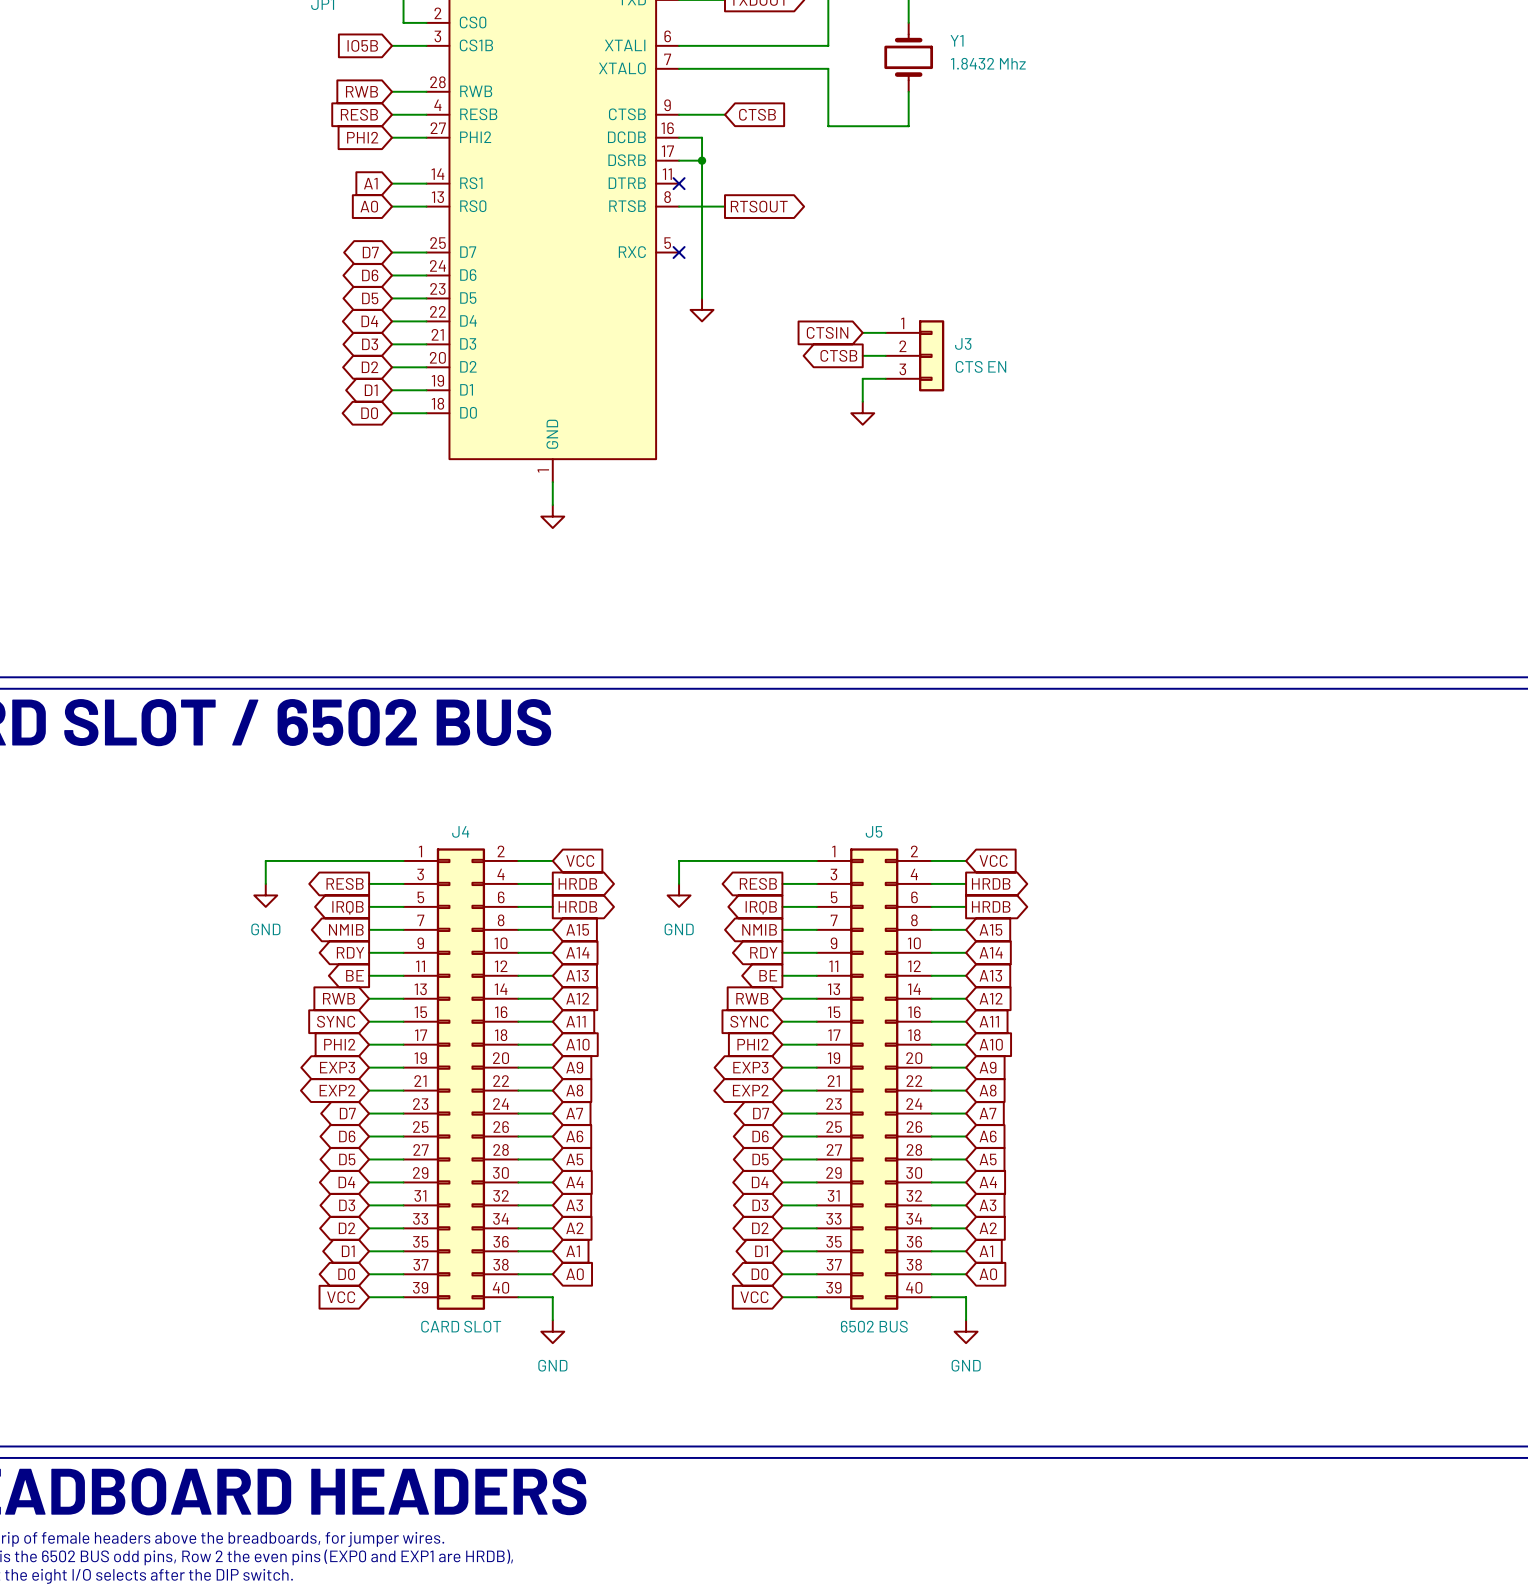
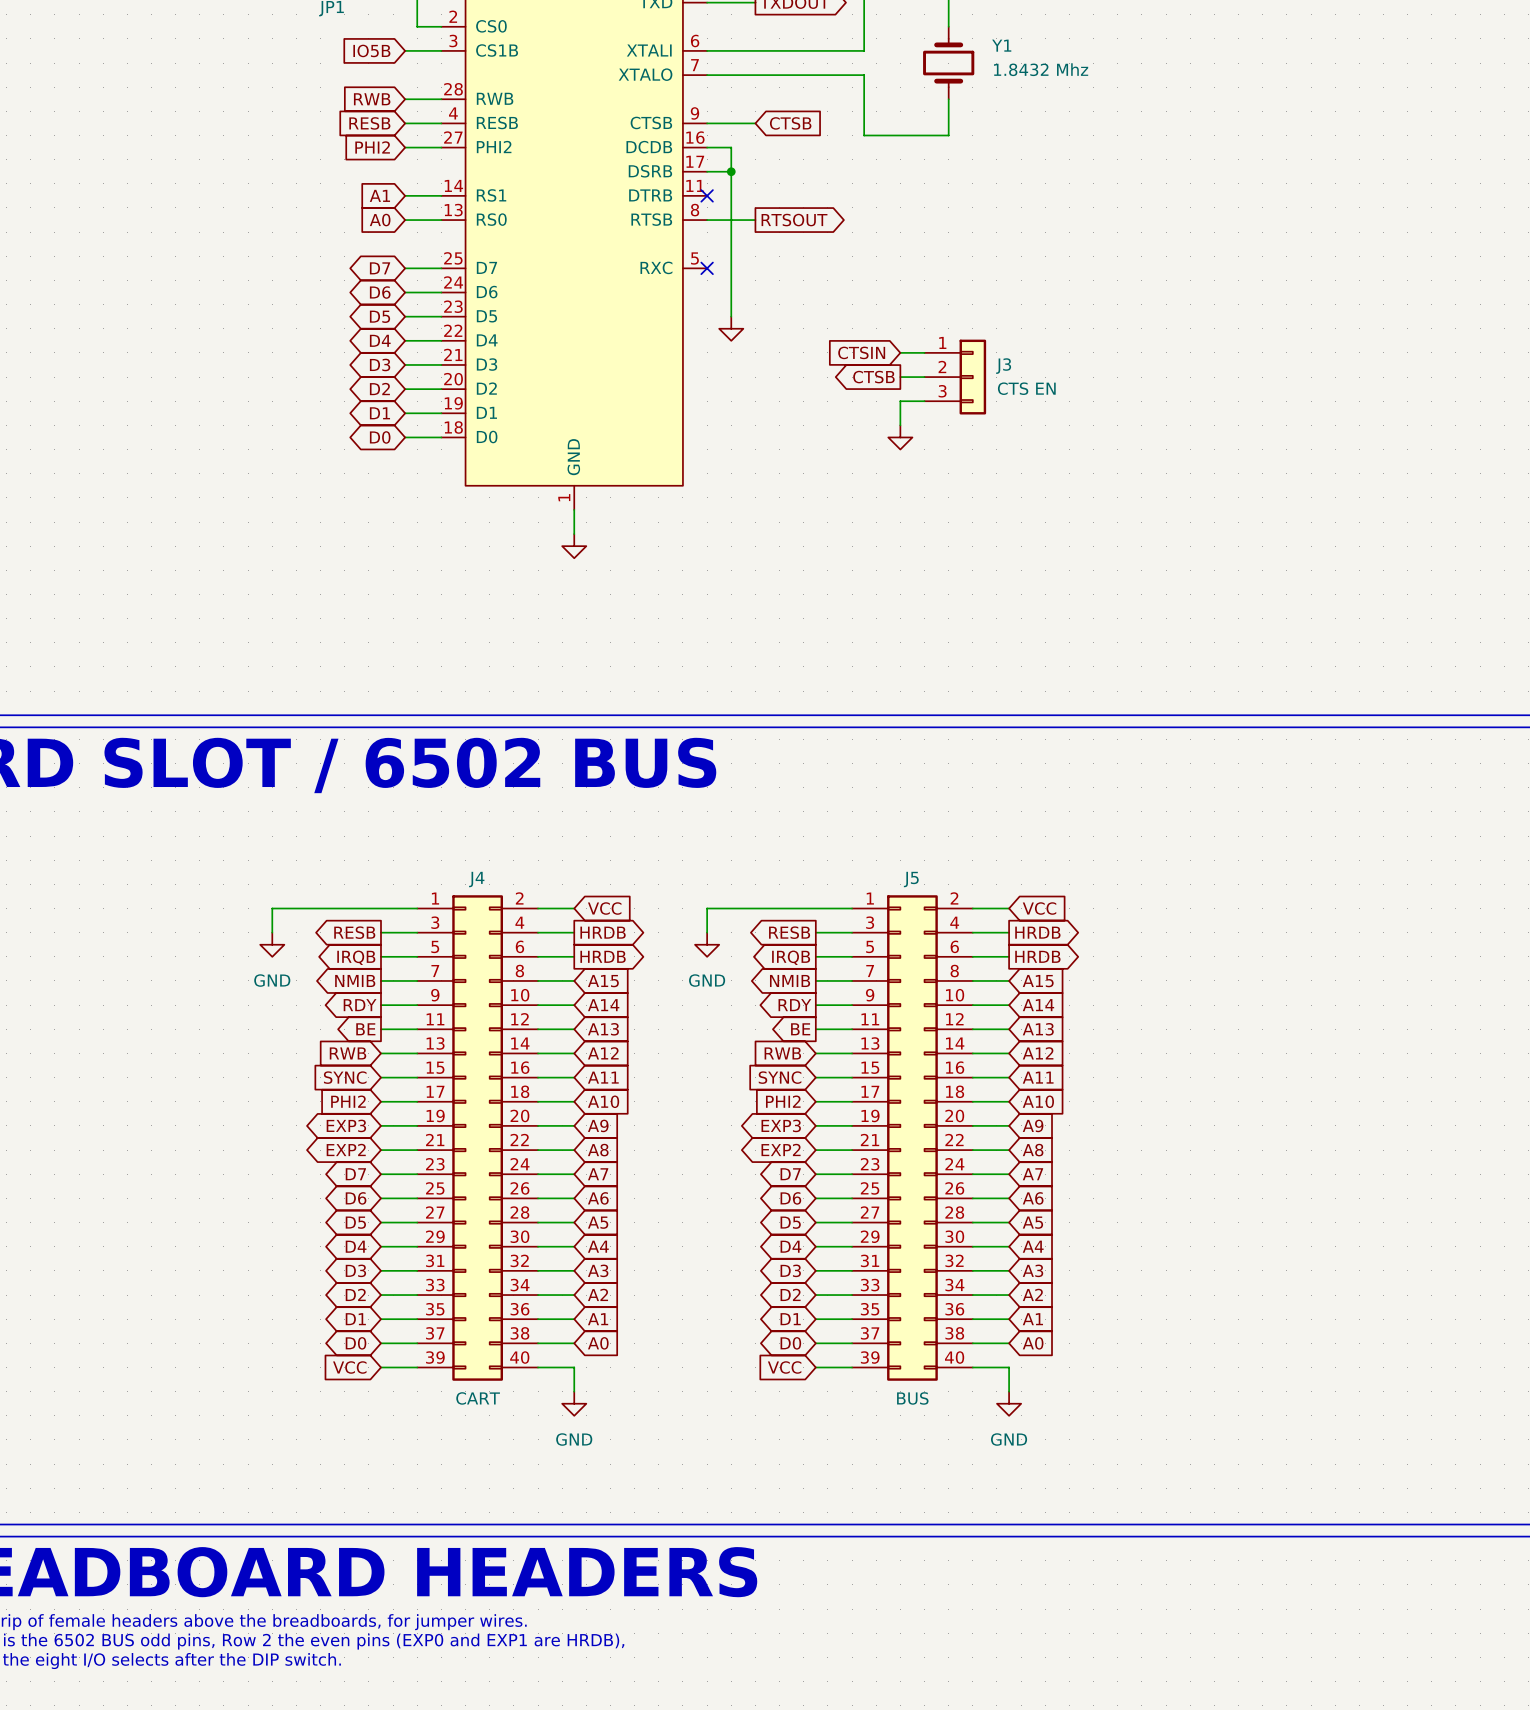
J4 value: CARD SLOT (461, 1326) -> CART (478, 1398)
J5 value: 6502 BUS (874, 1326) -> BUS (912, 1398)

